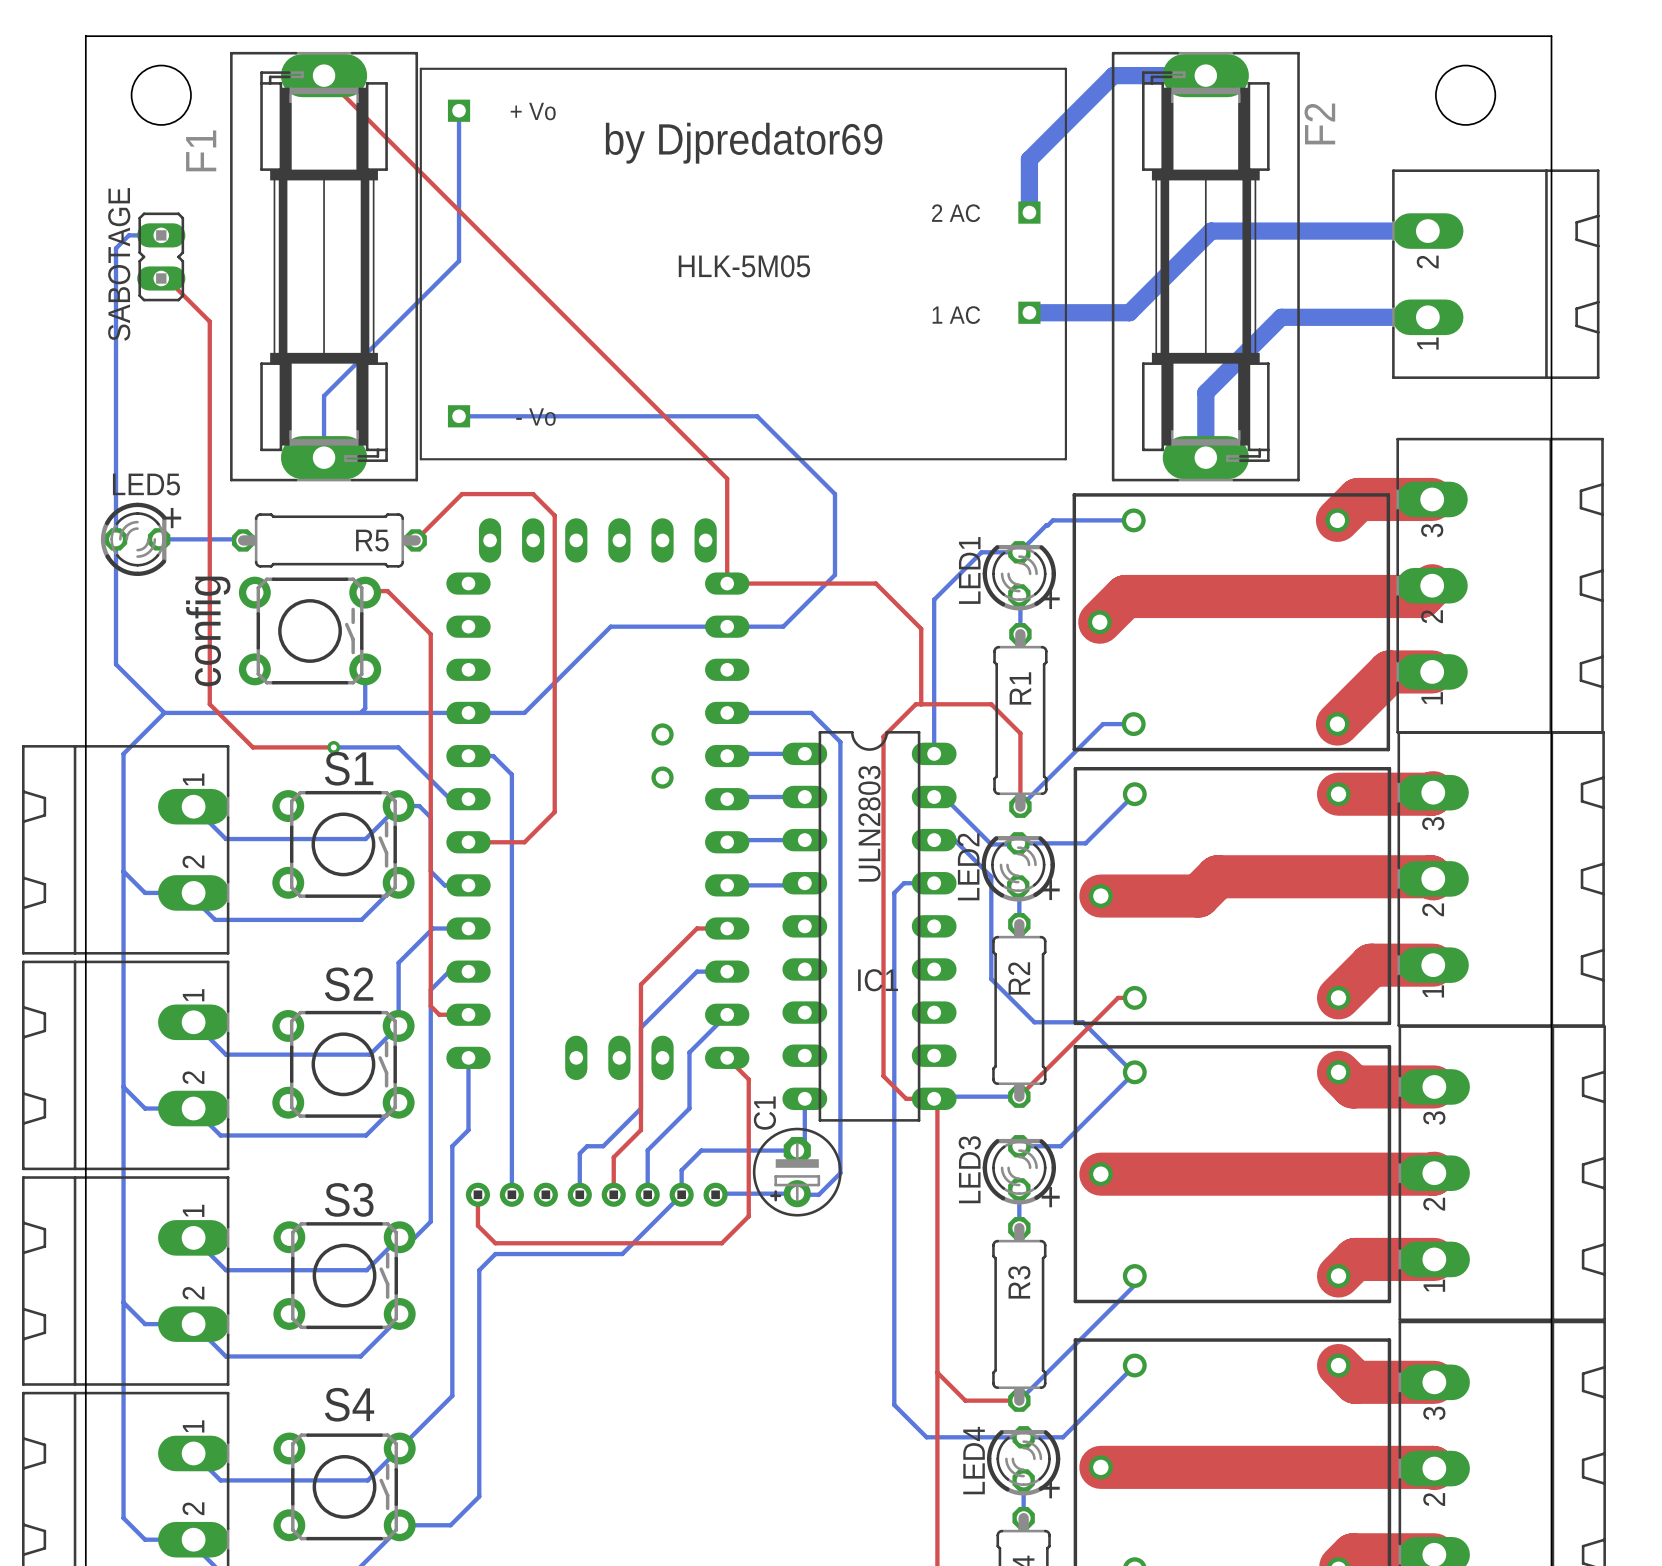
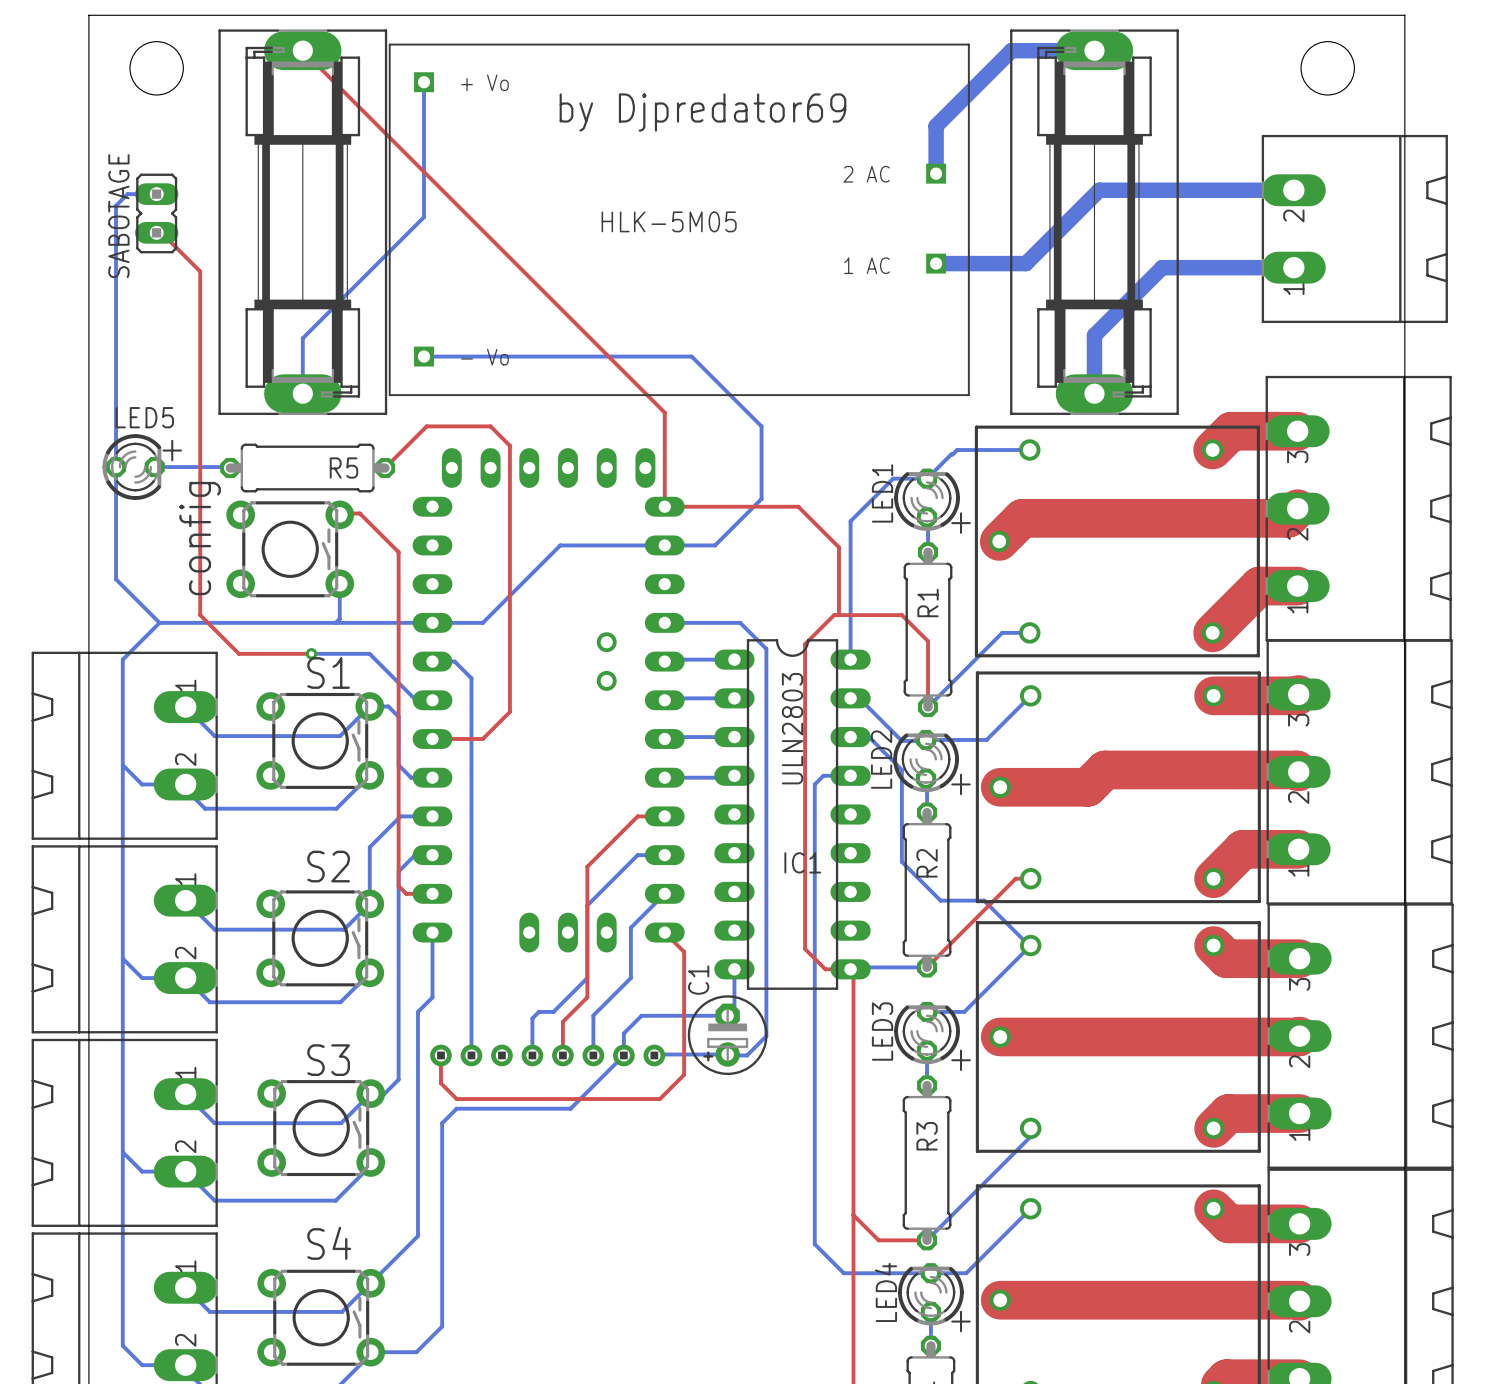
part value: F2 (1319, 123) -> none
part value: F1 (201, 150) -> none

